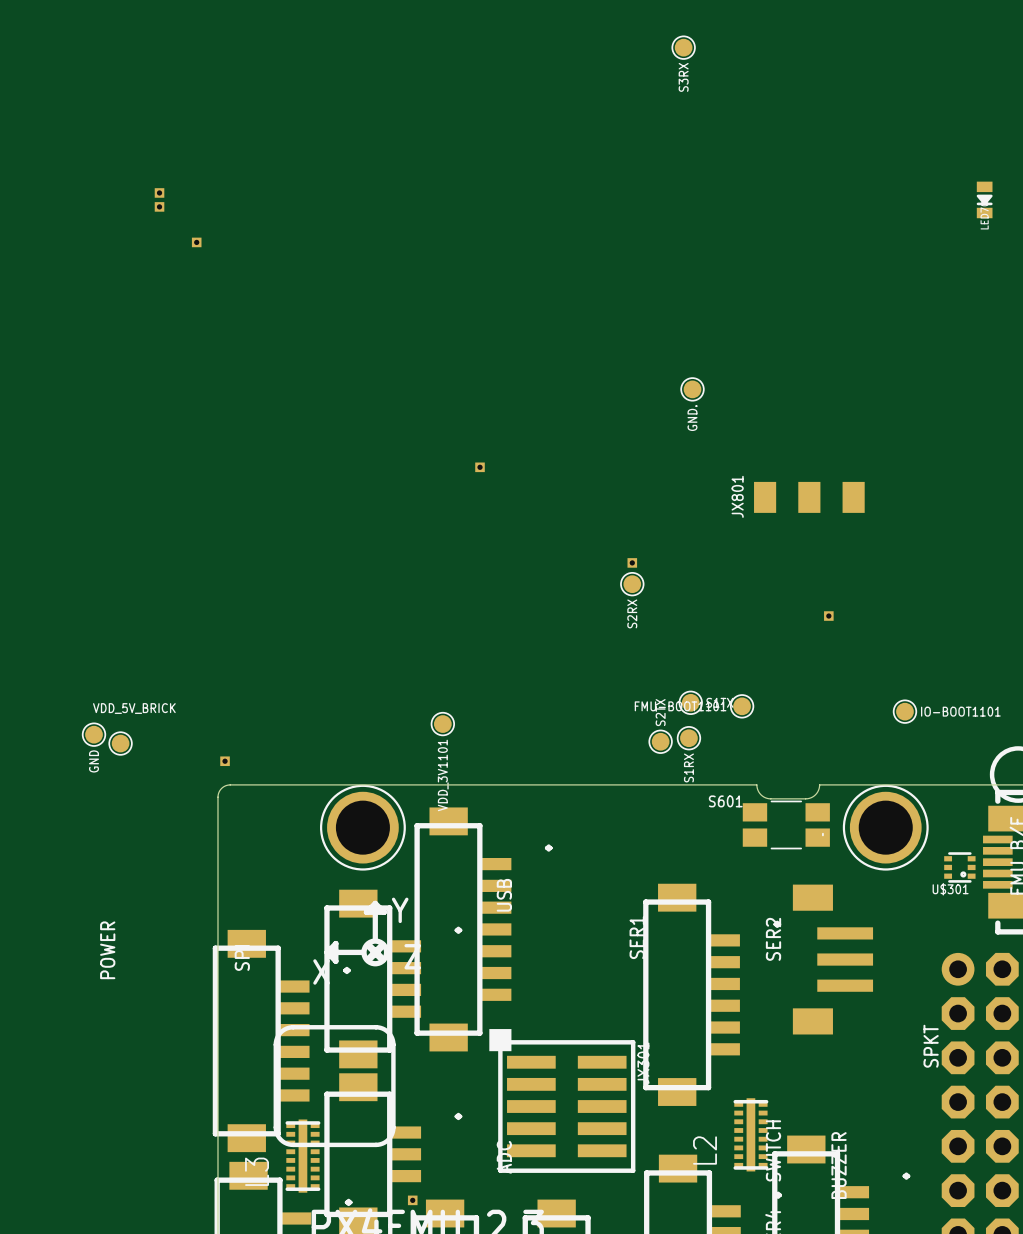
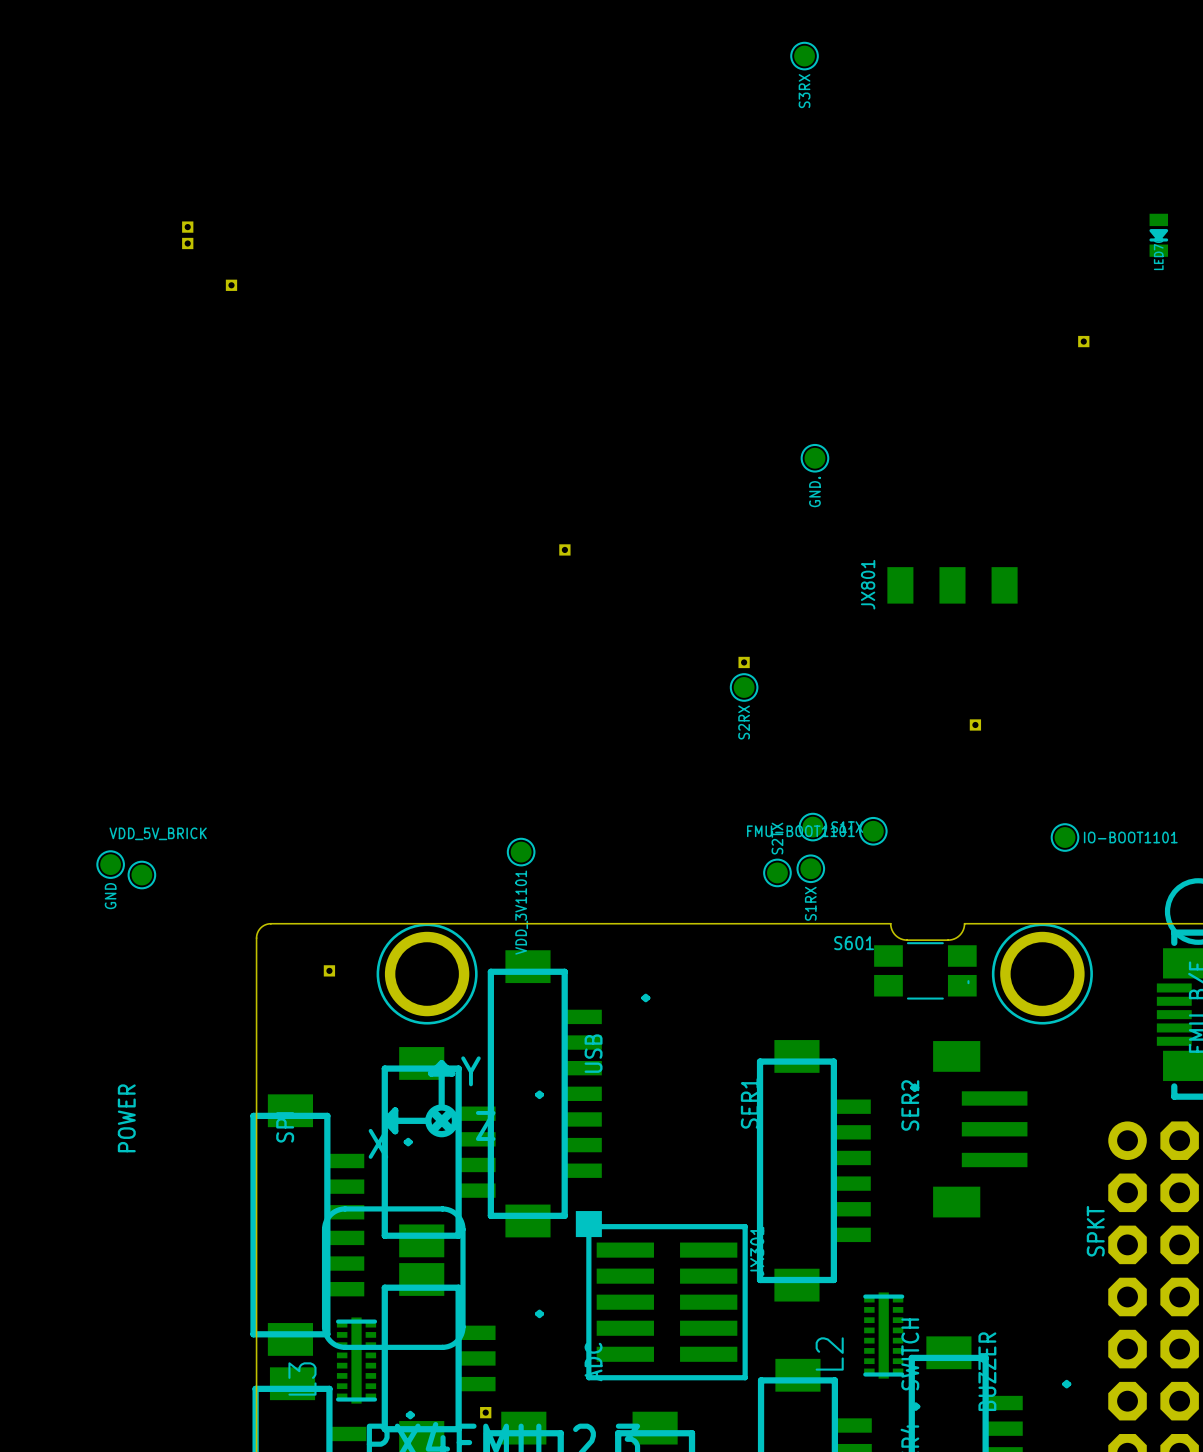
part: none -> (1083, 341)
part position: (225, 761) -> (329, 970)
U$301: (959, 867) -> none

